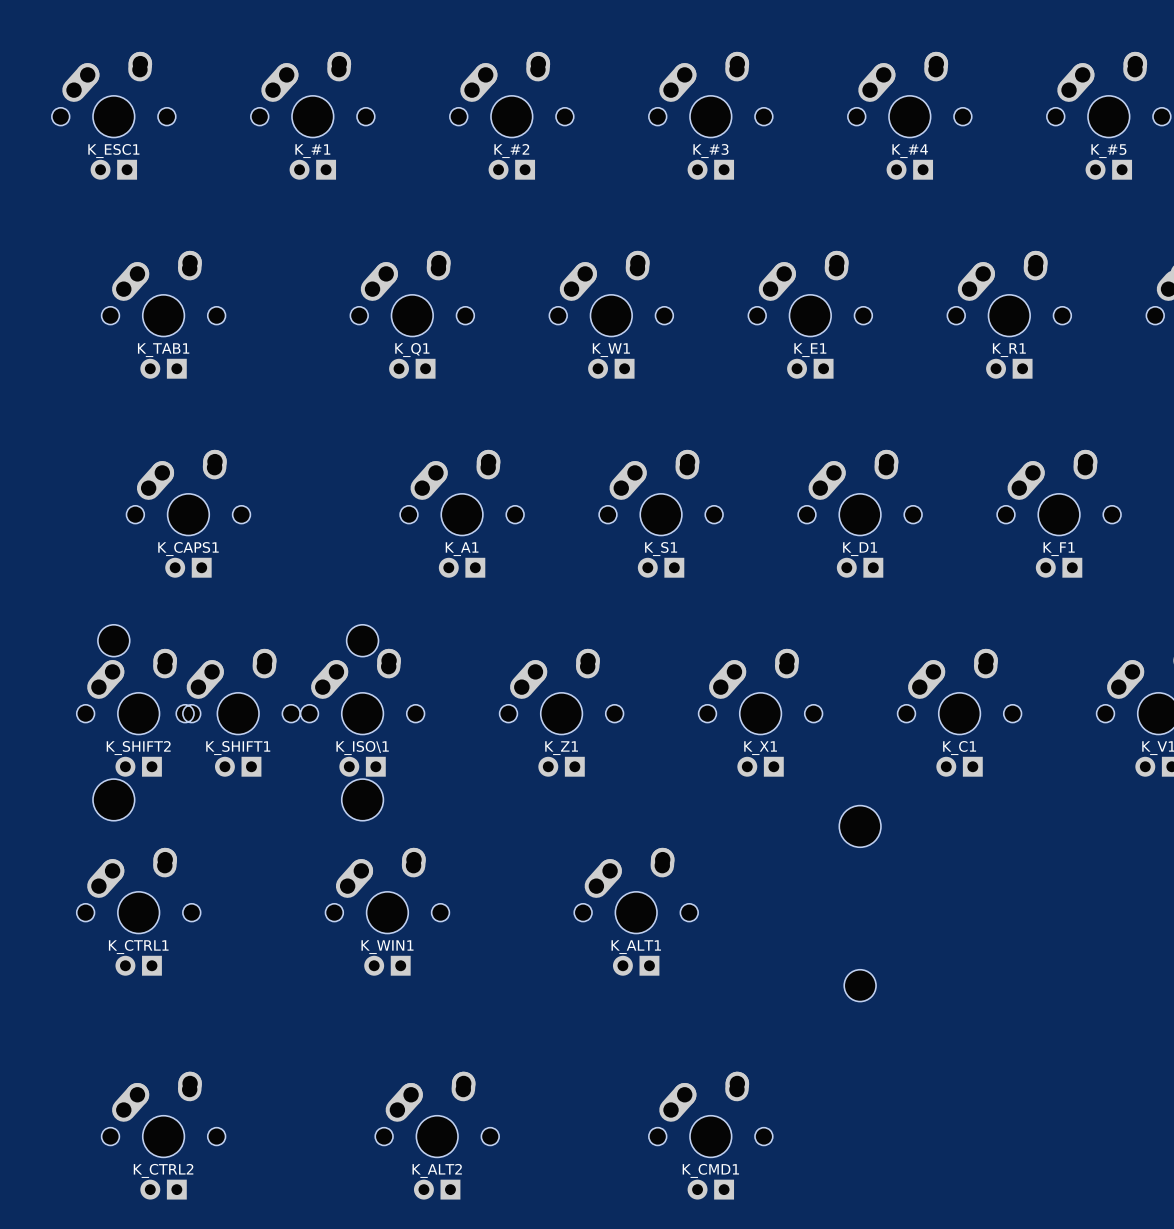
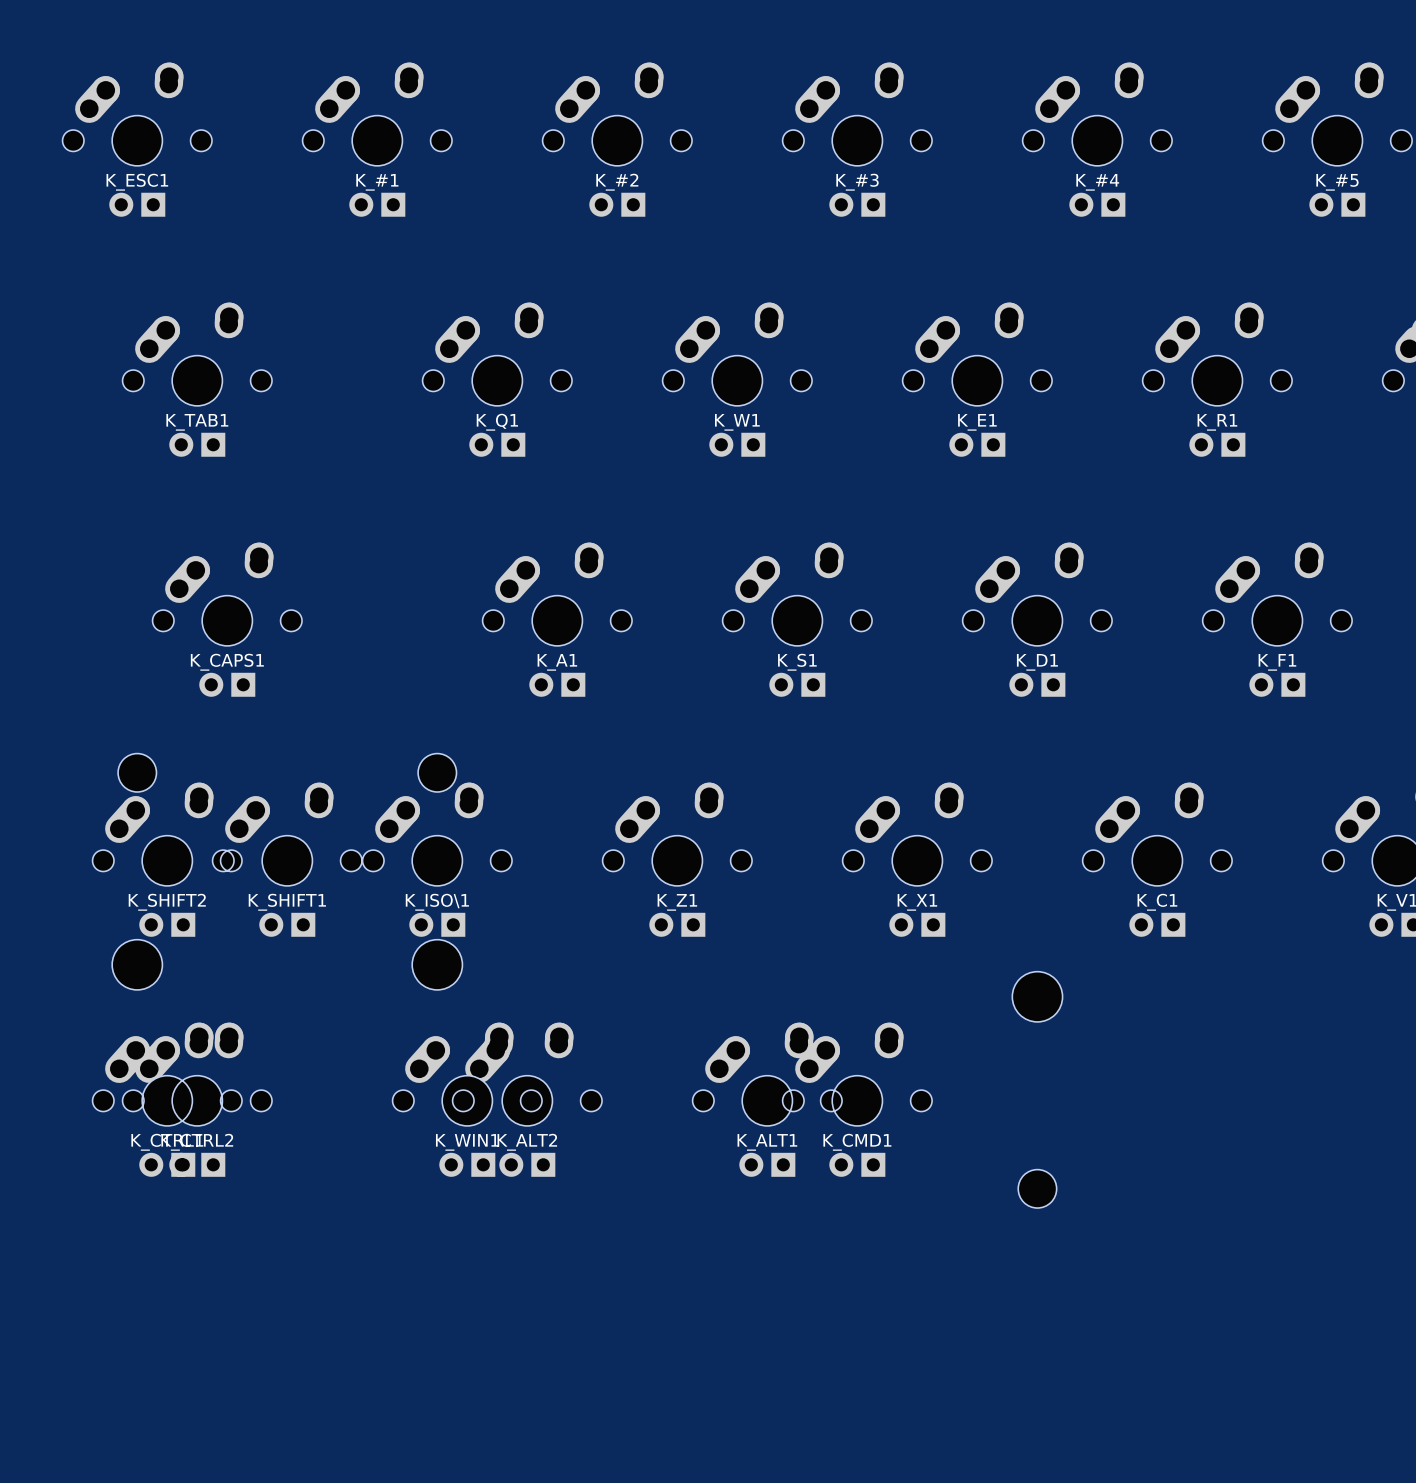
K_CTRL2 position: (163, 1135) -> (197, 1099)
K_ALT2 position: (437, 1135) -> (527, 1099)
K_CMD1 position: (710, 1135) -> (857, 1099)

